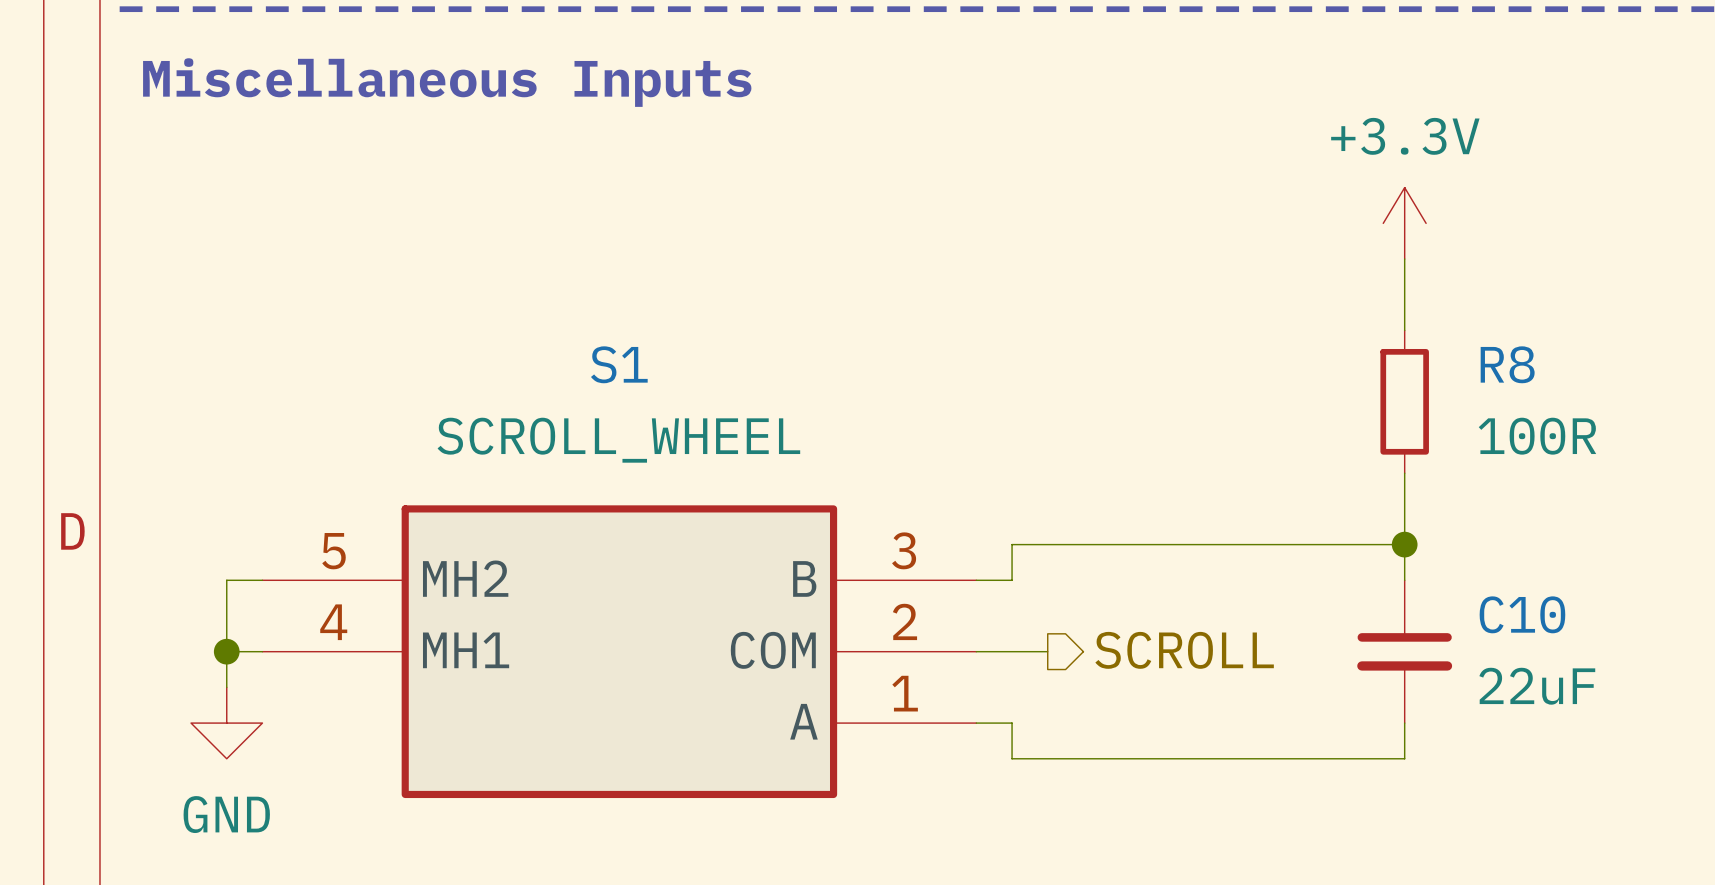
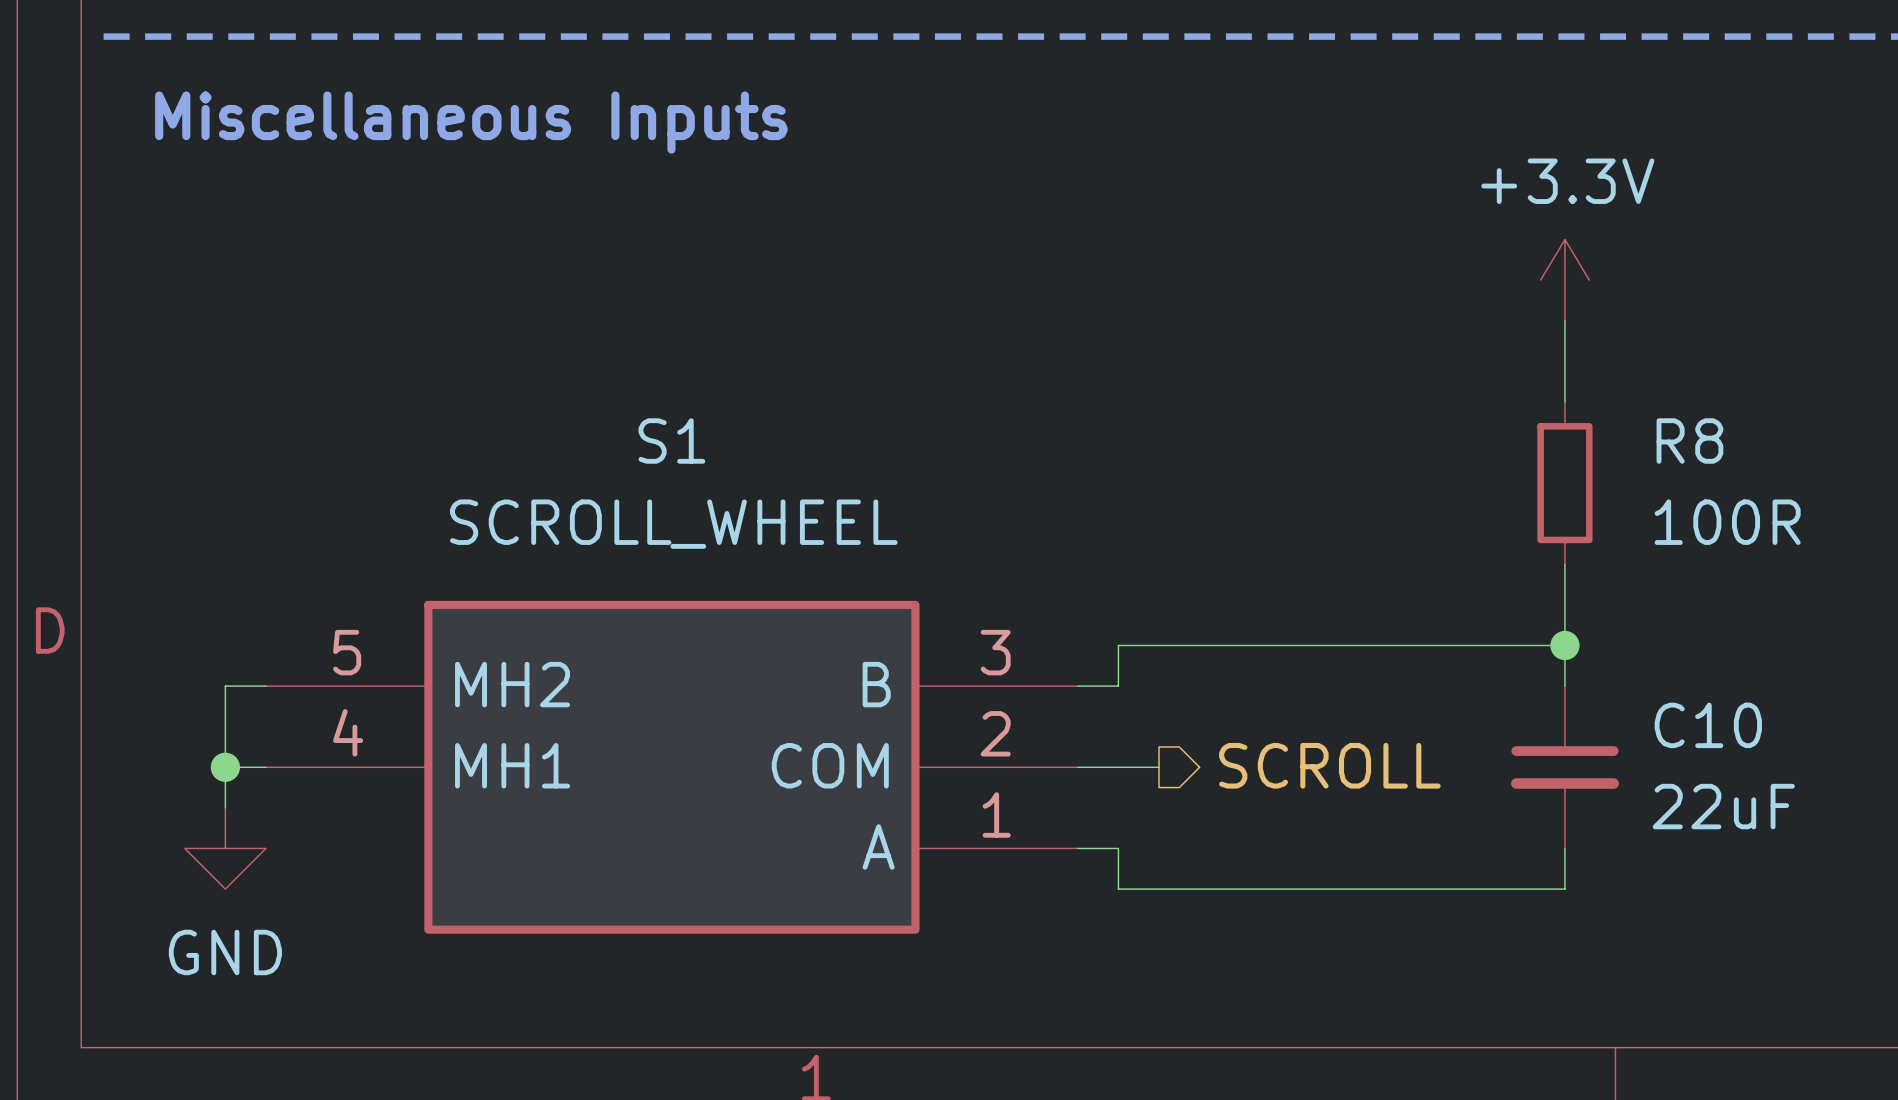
text position: Miscellaneous Inputs (447, 82) -> Miscellaneous Inputs (471, 122)

